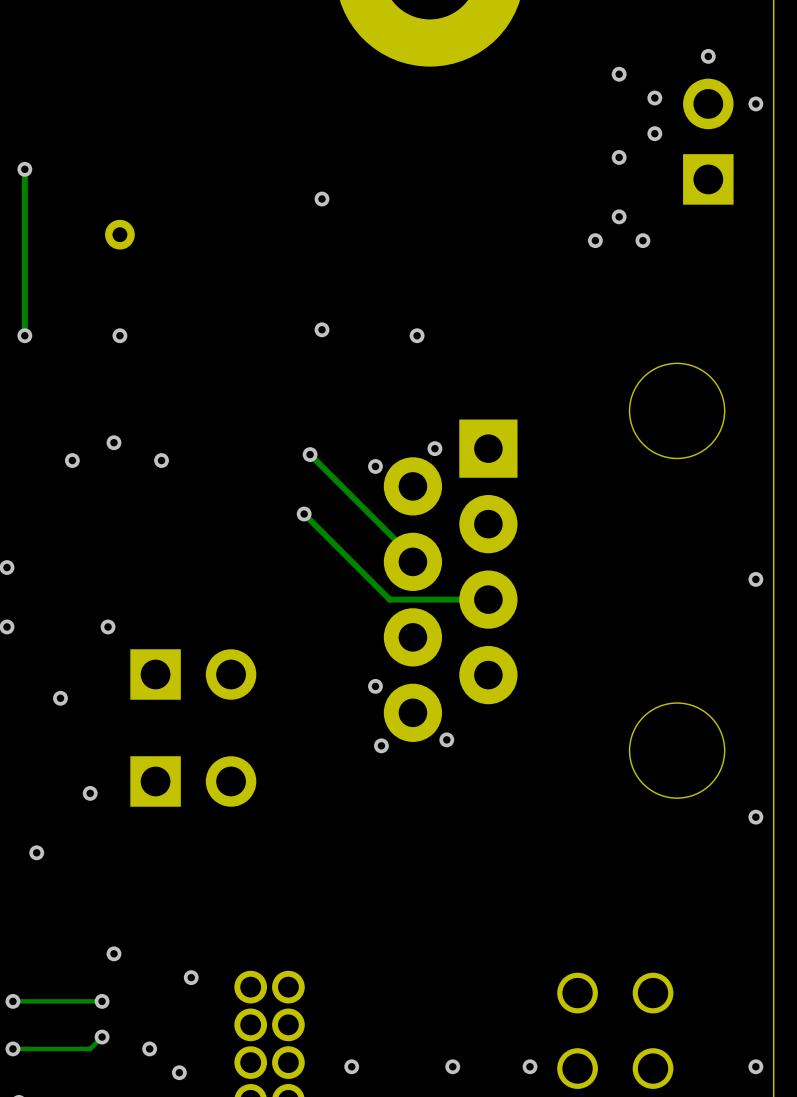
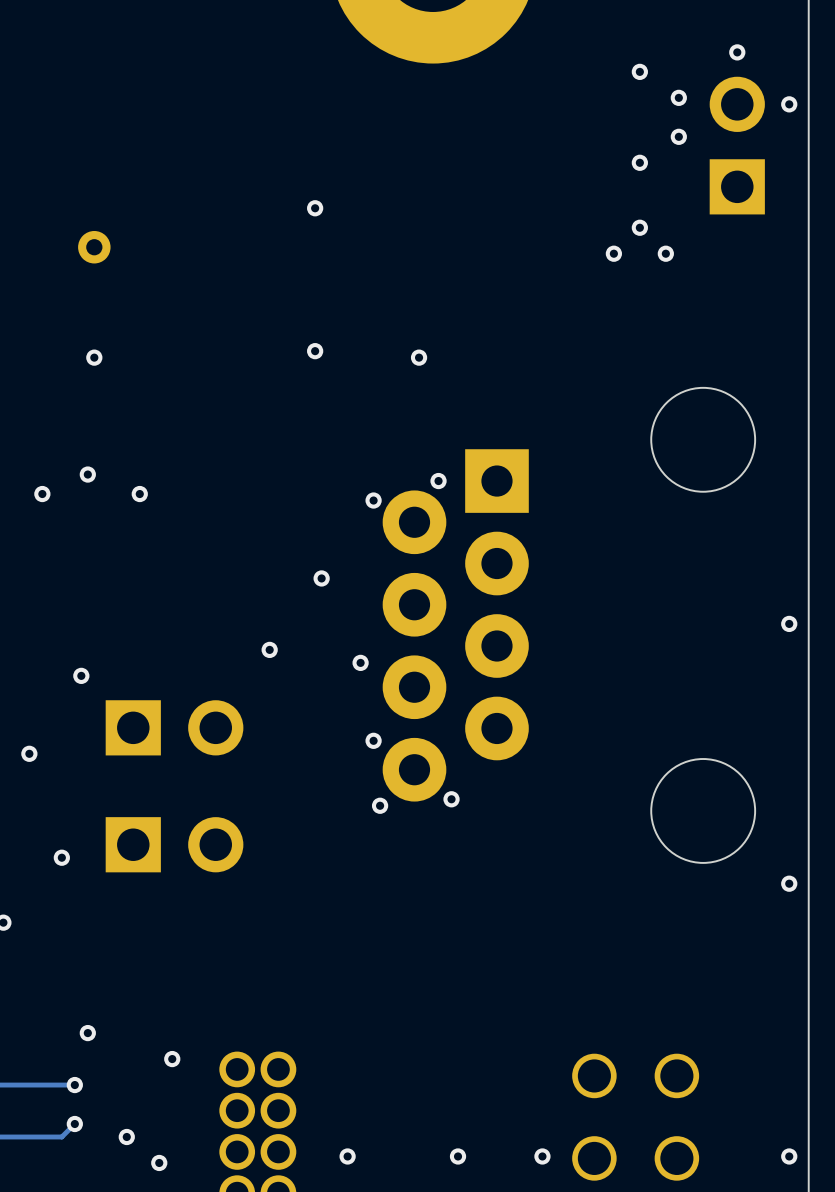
track: (310, 454) (412, 557) (412, 561) -> none
via: (310, 454) -> none
track: (304, 514) (389, 599) (488, 599) -> none
via position: (304, 514) -> (321, 578)
via: none -> (269, 649)
via: none -> (360, 662)

